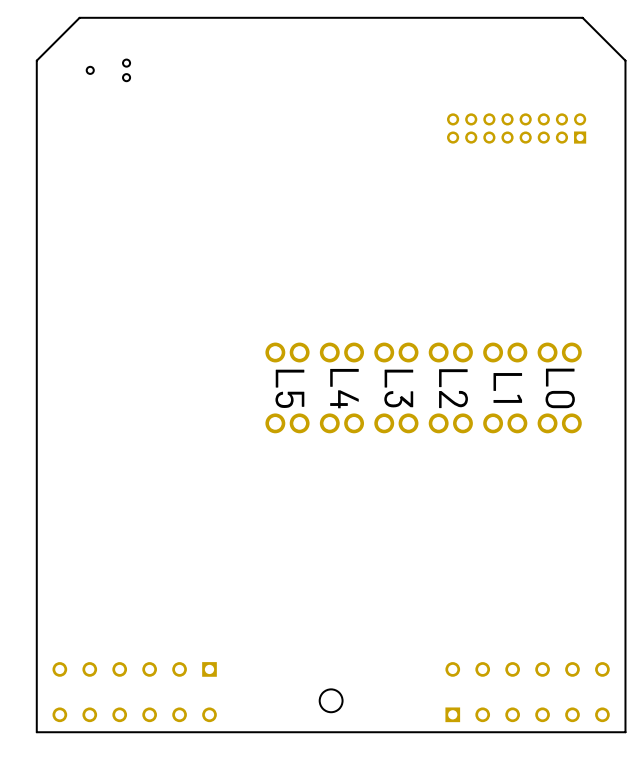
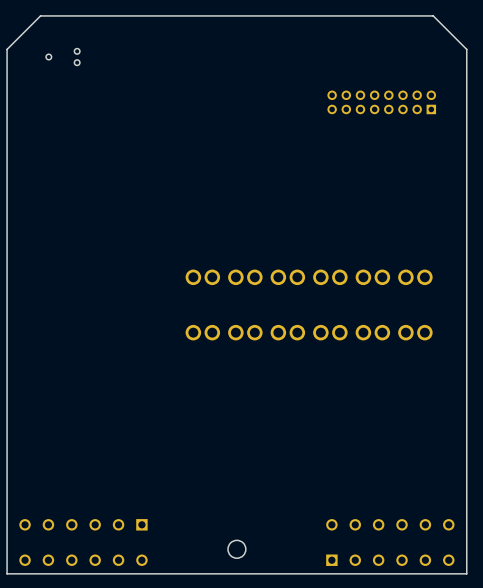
text: L1 (507, 387) -> none
text: L5 (289, 388) -> none
text: L4 (344, 388) -> none
text: L3 (398, 388) -> none
text: L2 (453, 388) -> none
text: L0 (560, 388) -> none

